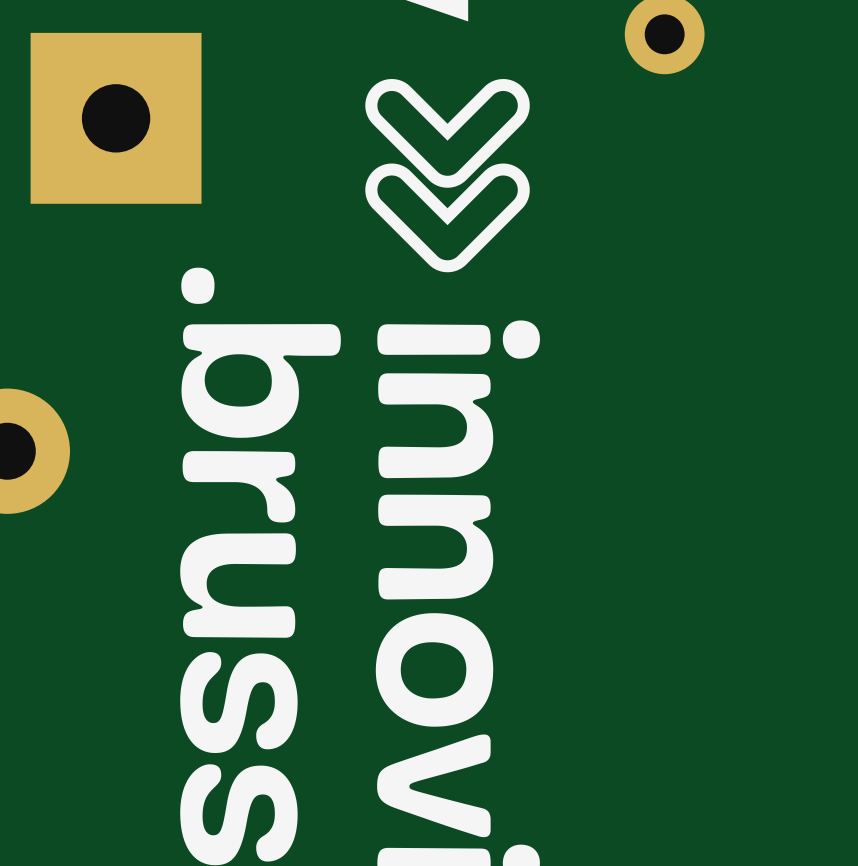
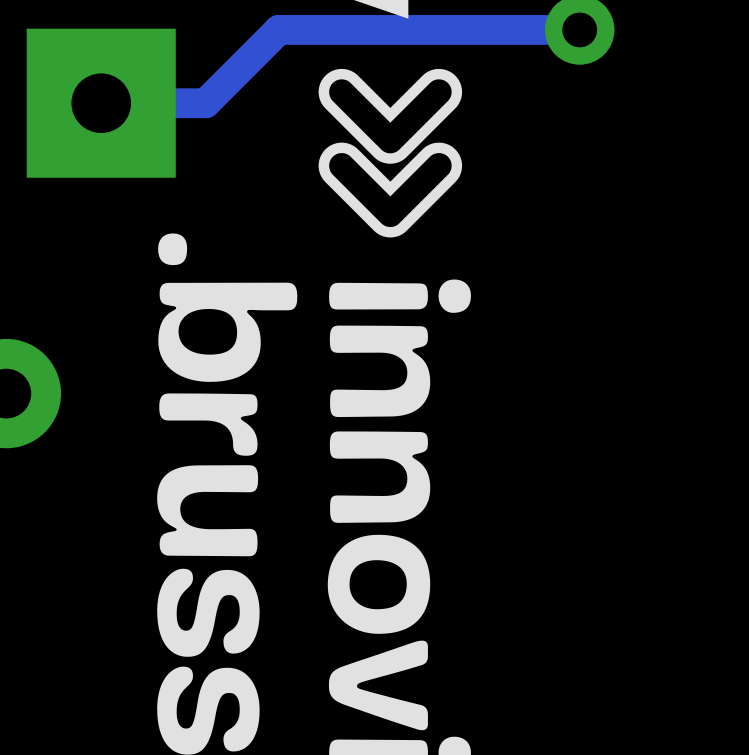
track: none -> (579, 29) (278, 29) (205, 103) (101, 103)

